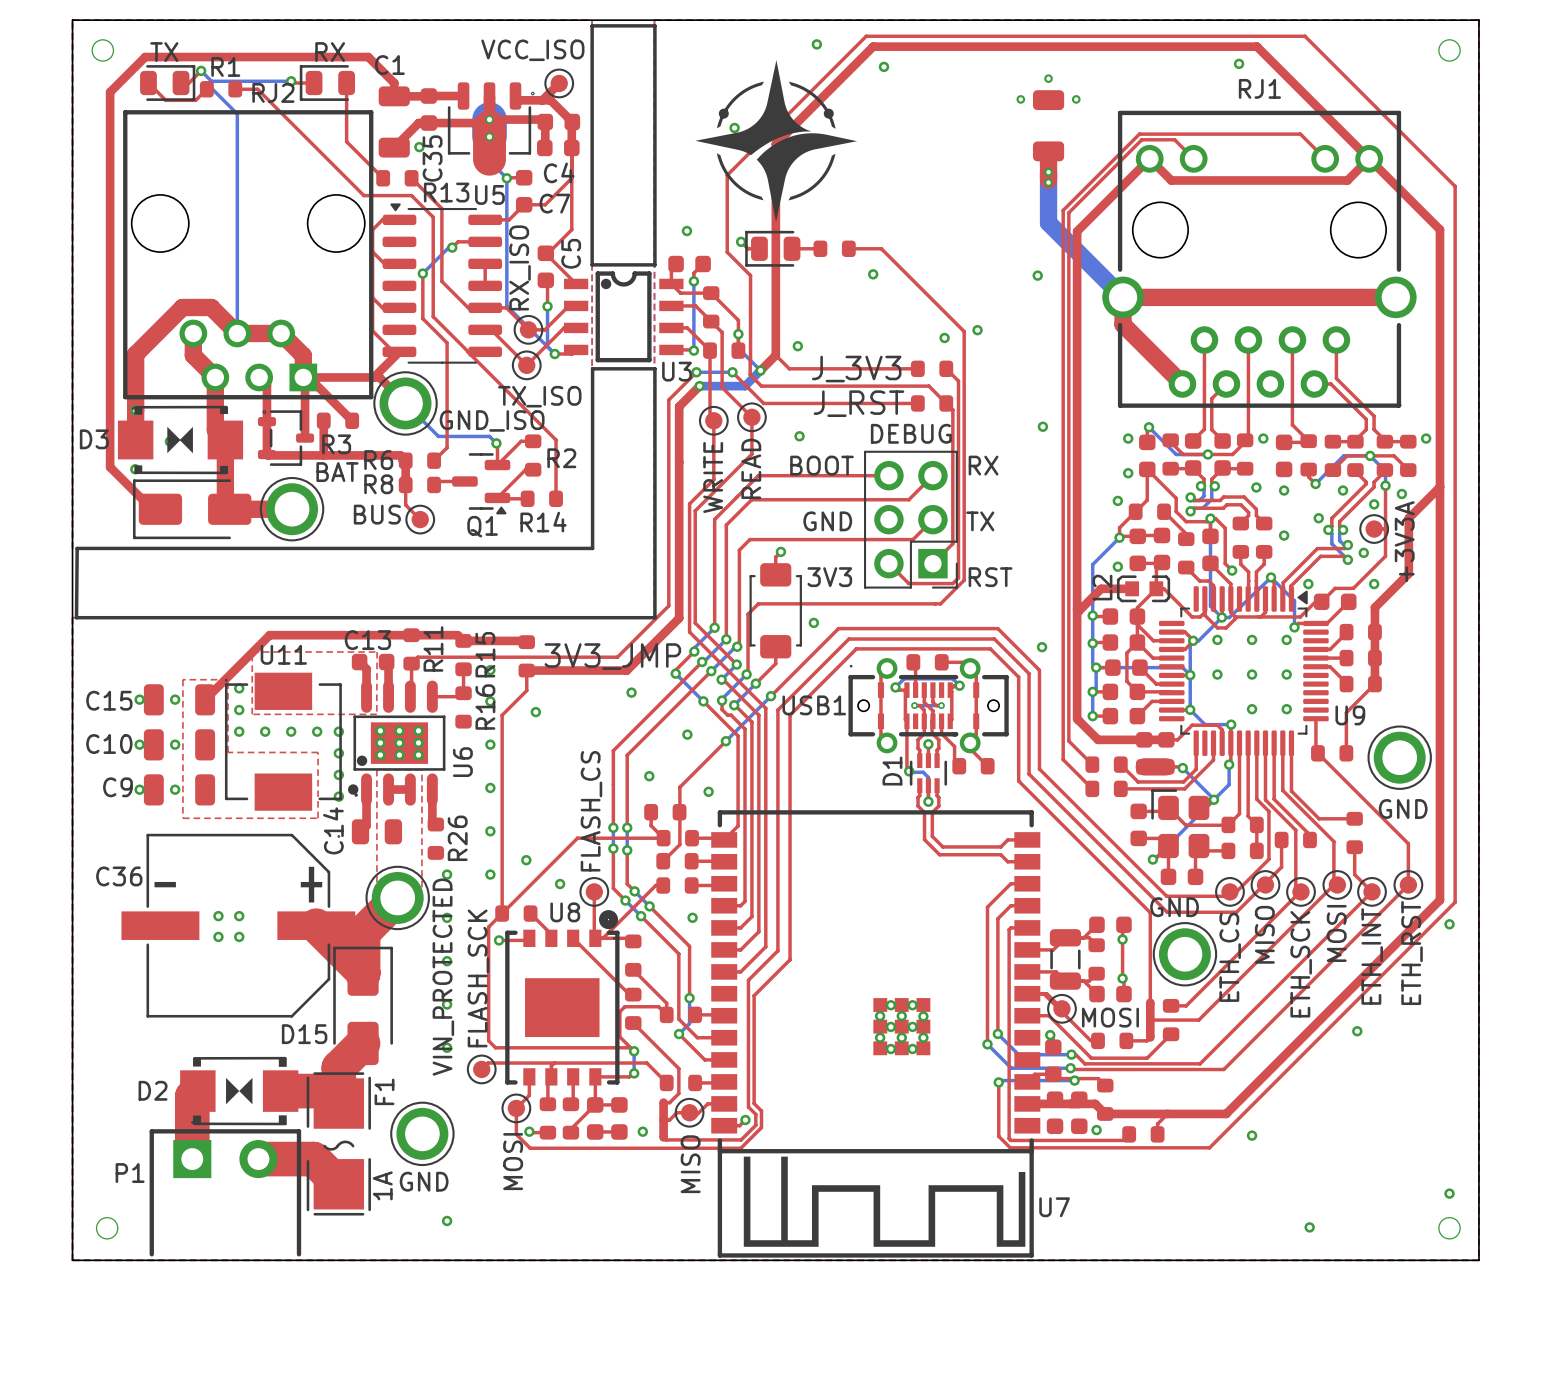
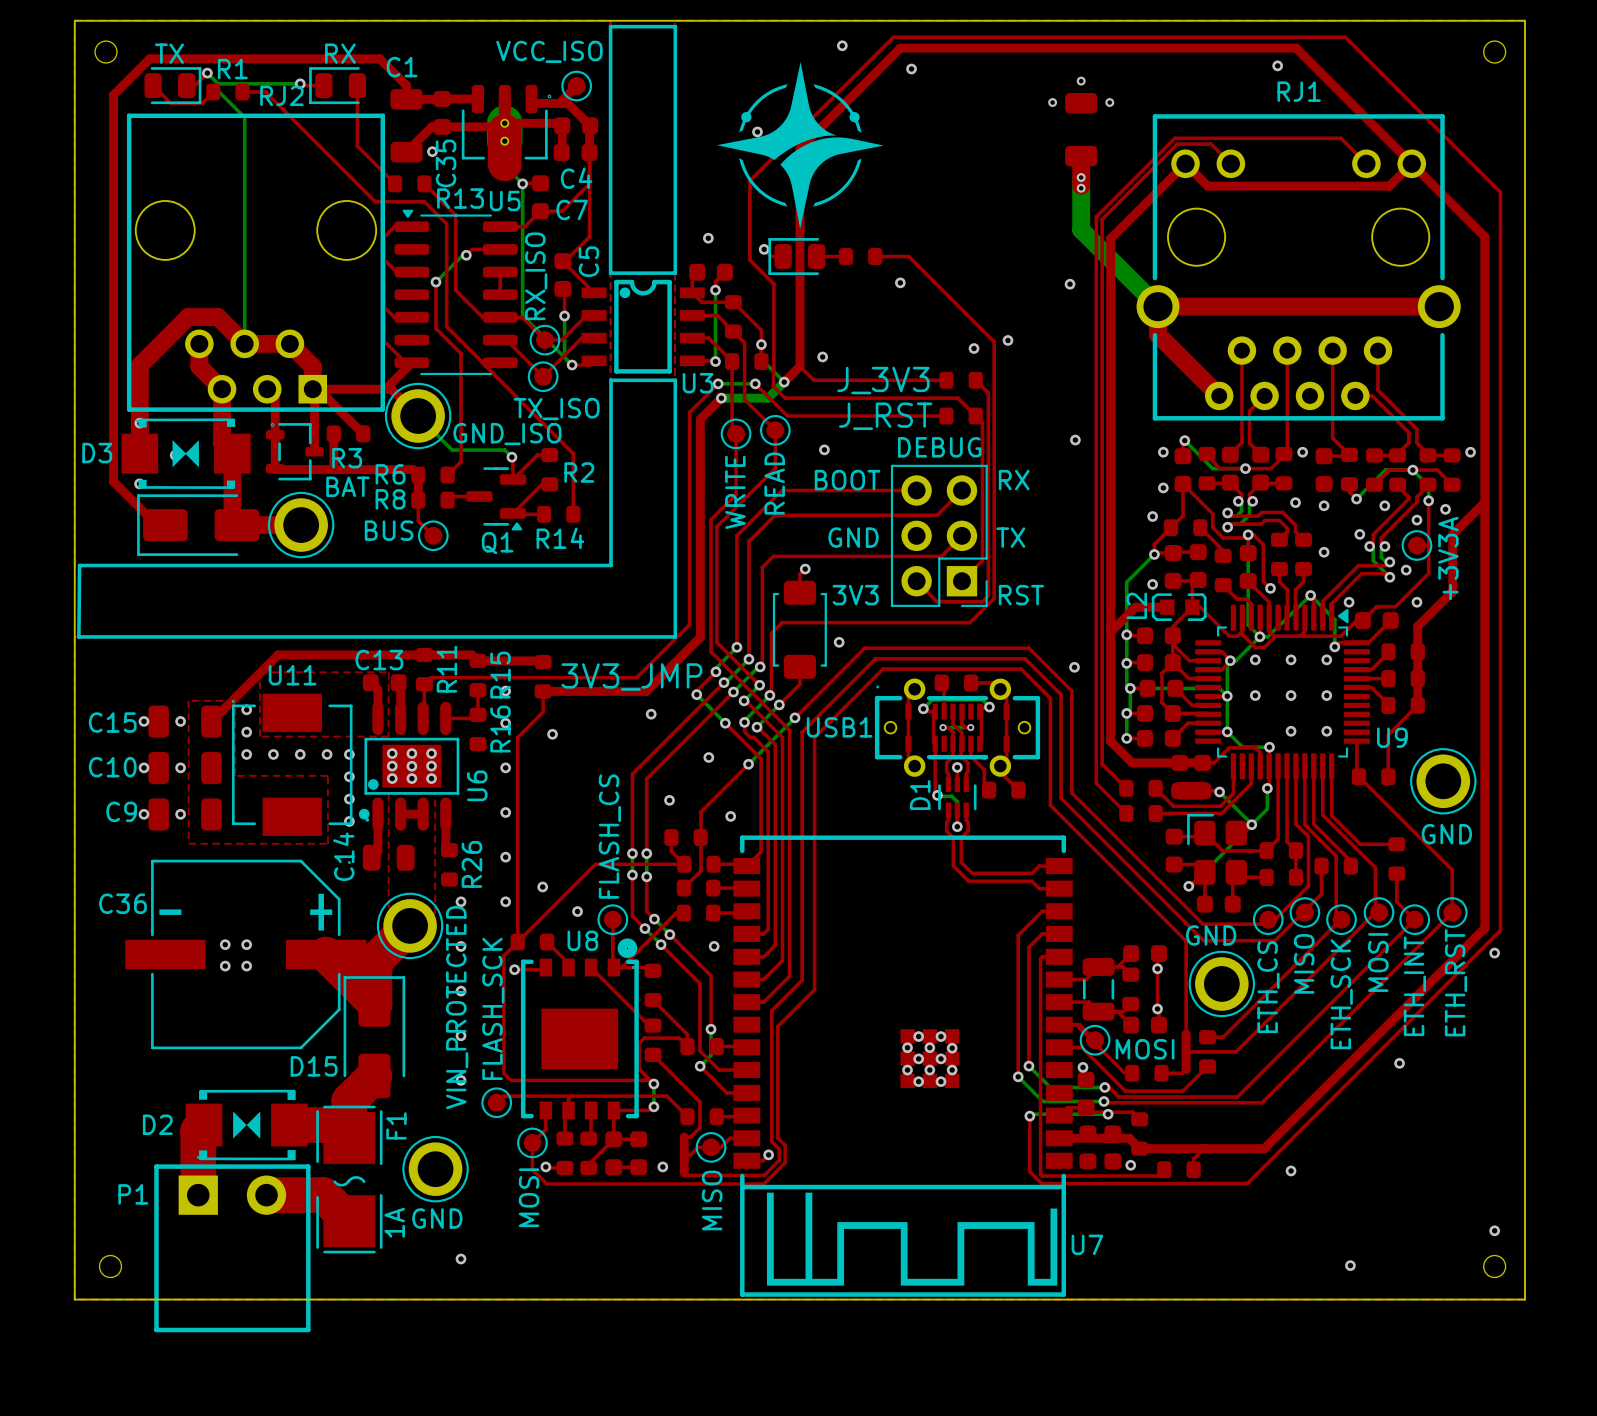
P1 footprint: [149, 1129, 302, 1257] -> [154, 1164, 311, 1333]

